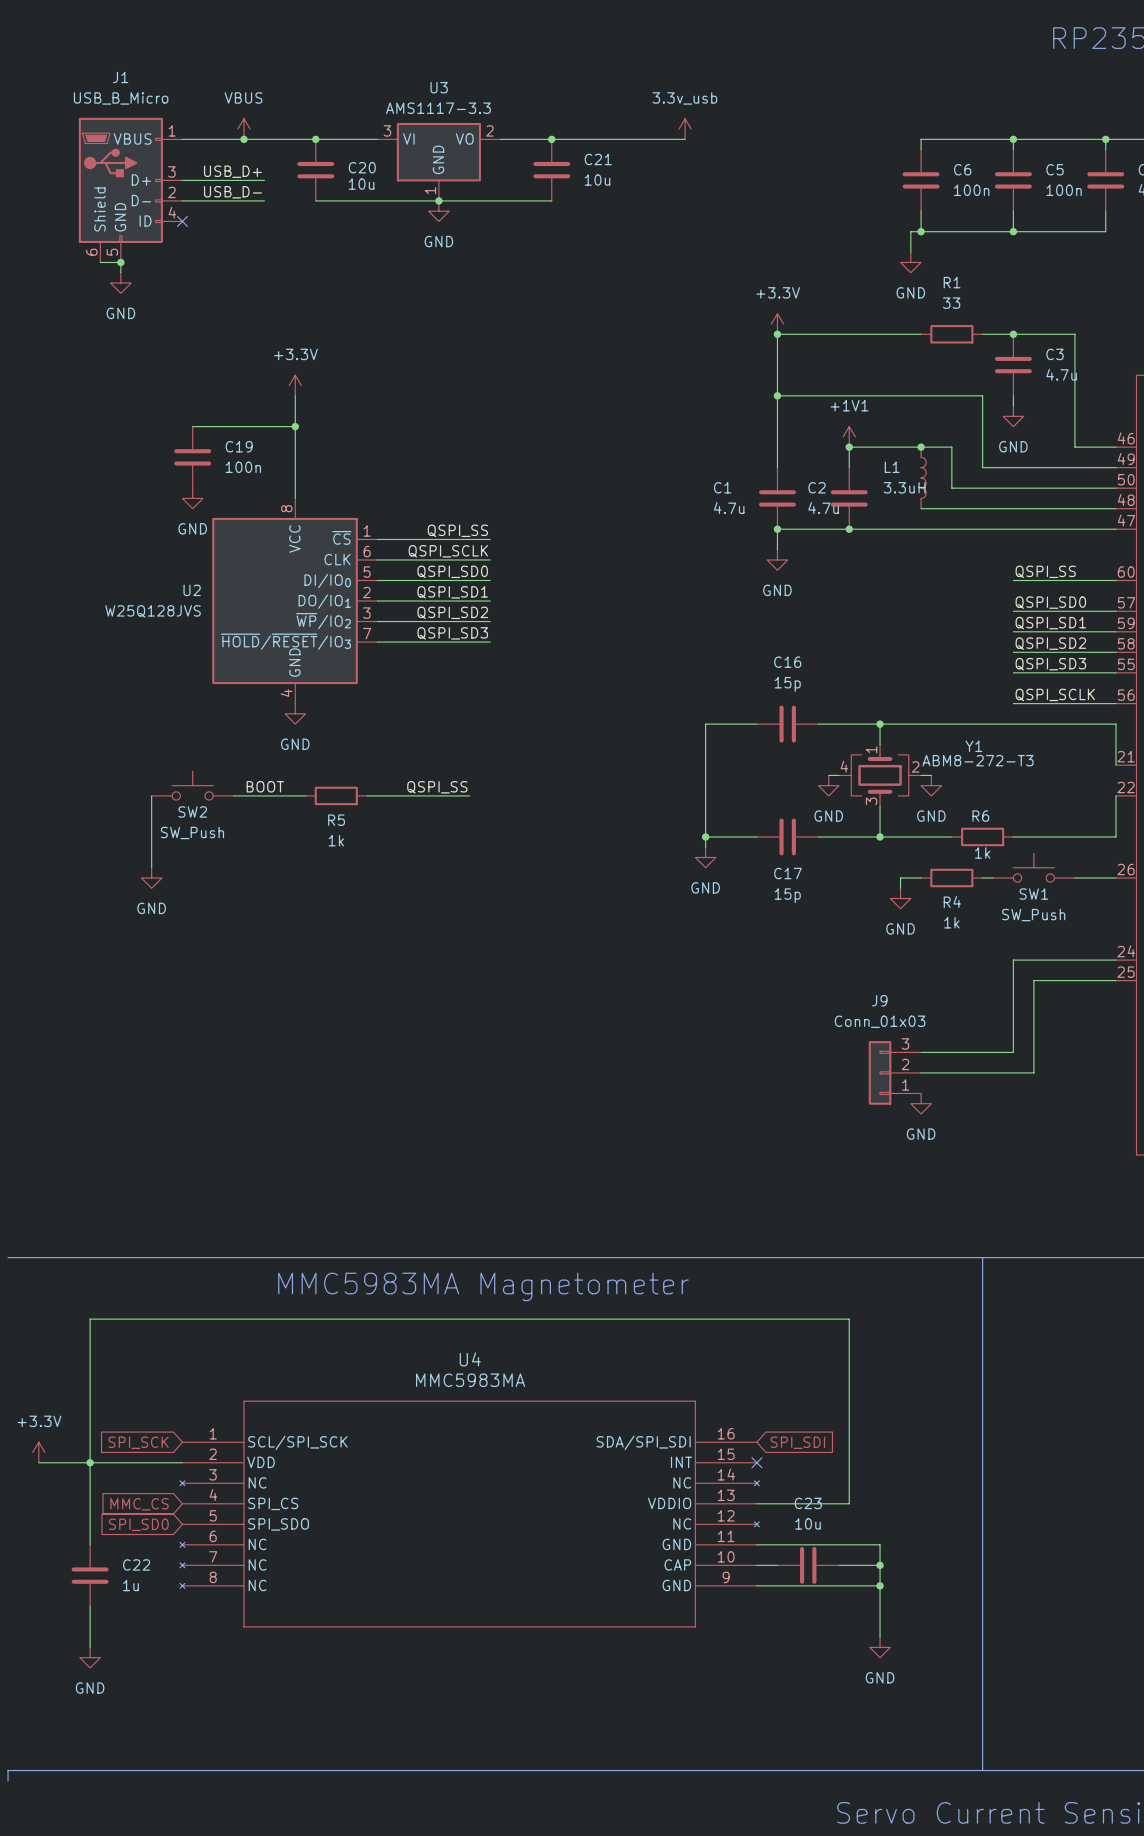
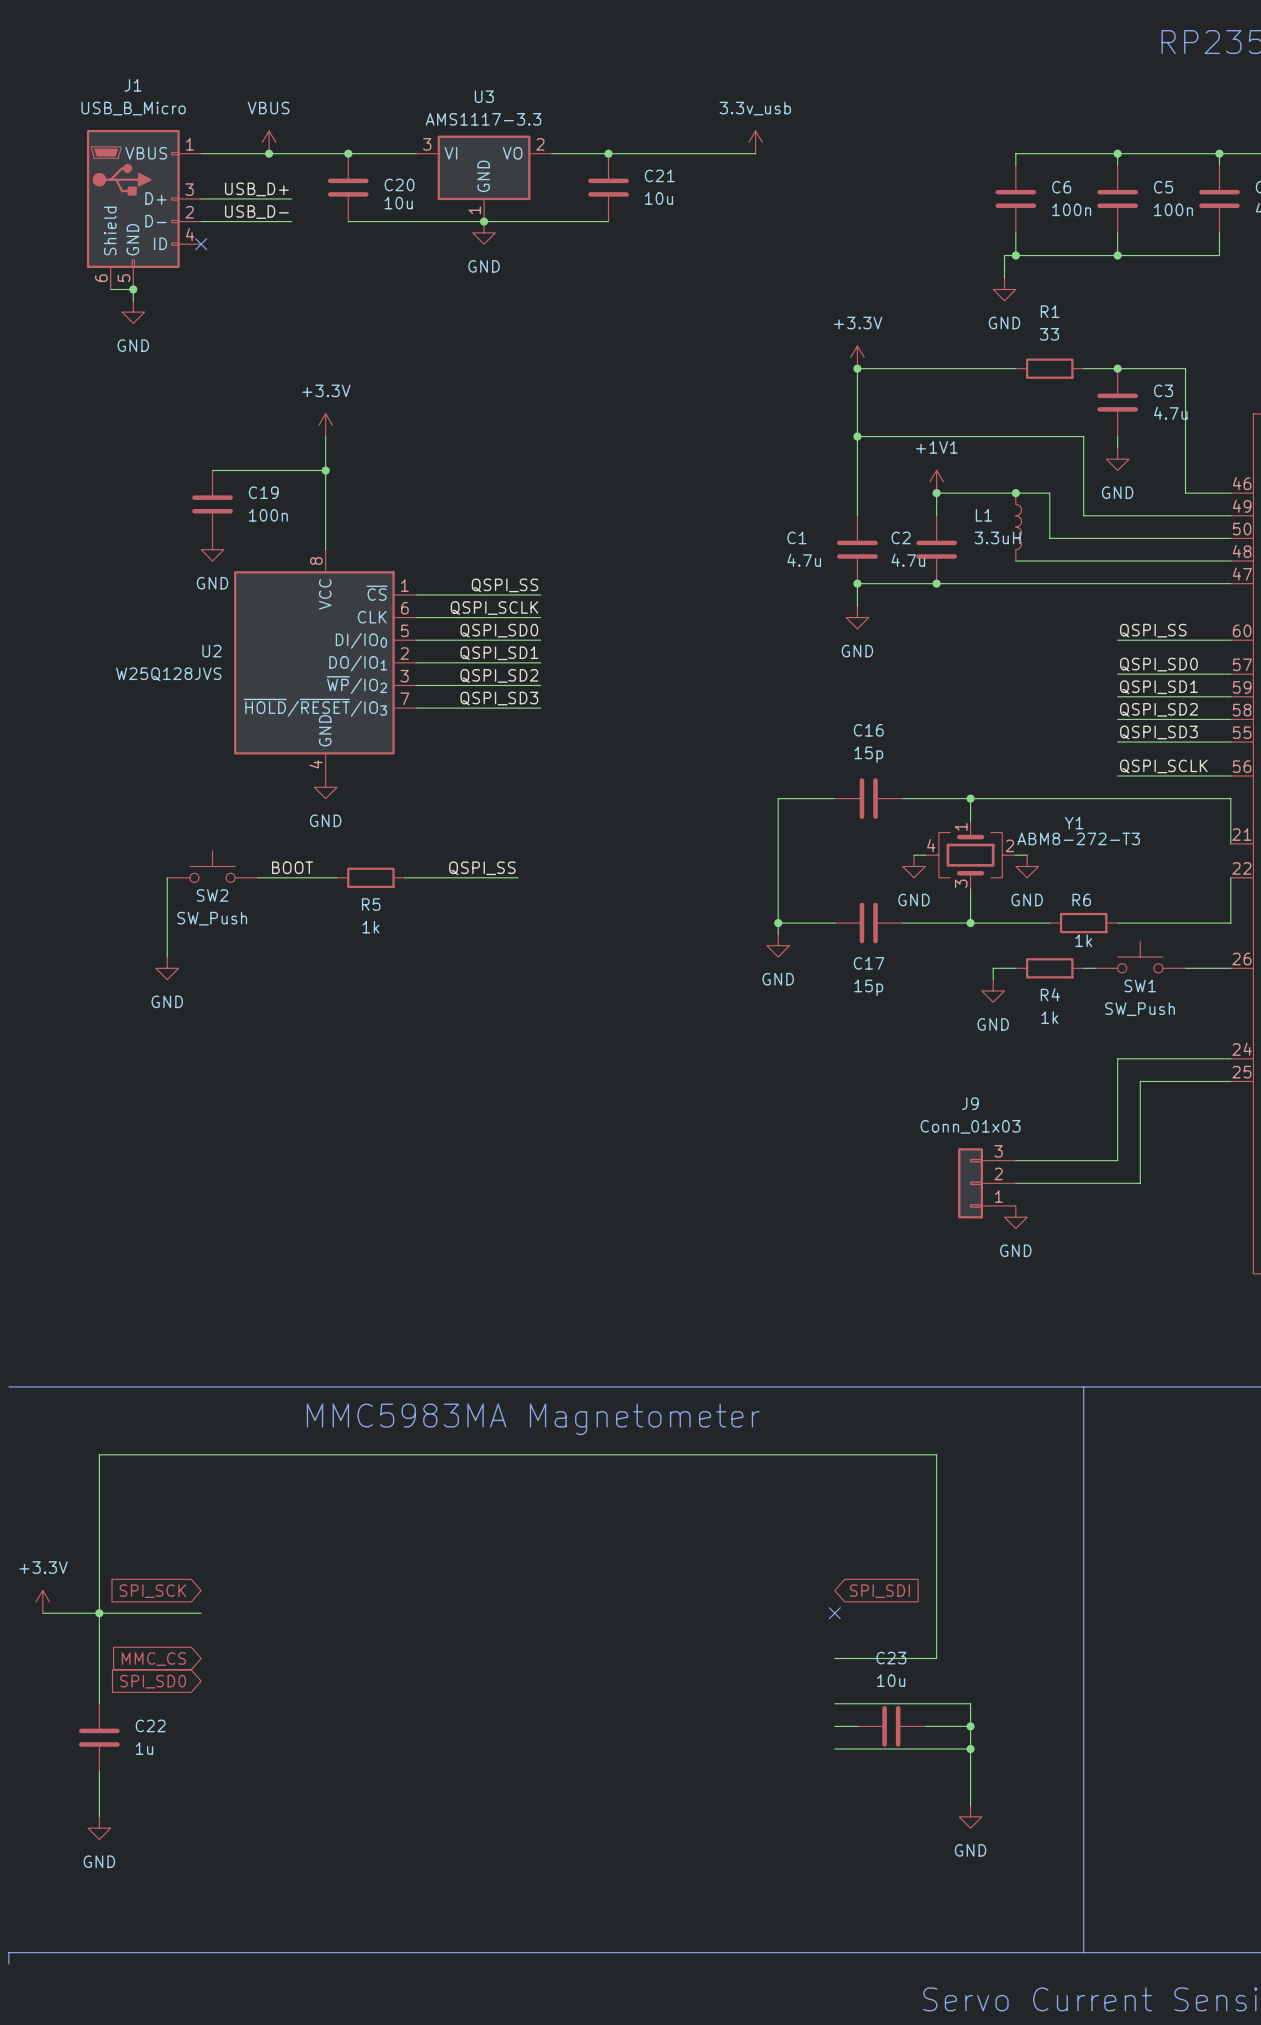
U4: MMC5983MA (469, 1514) -> none

